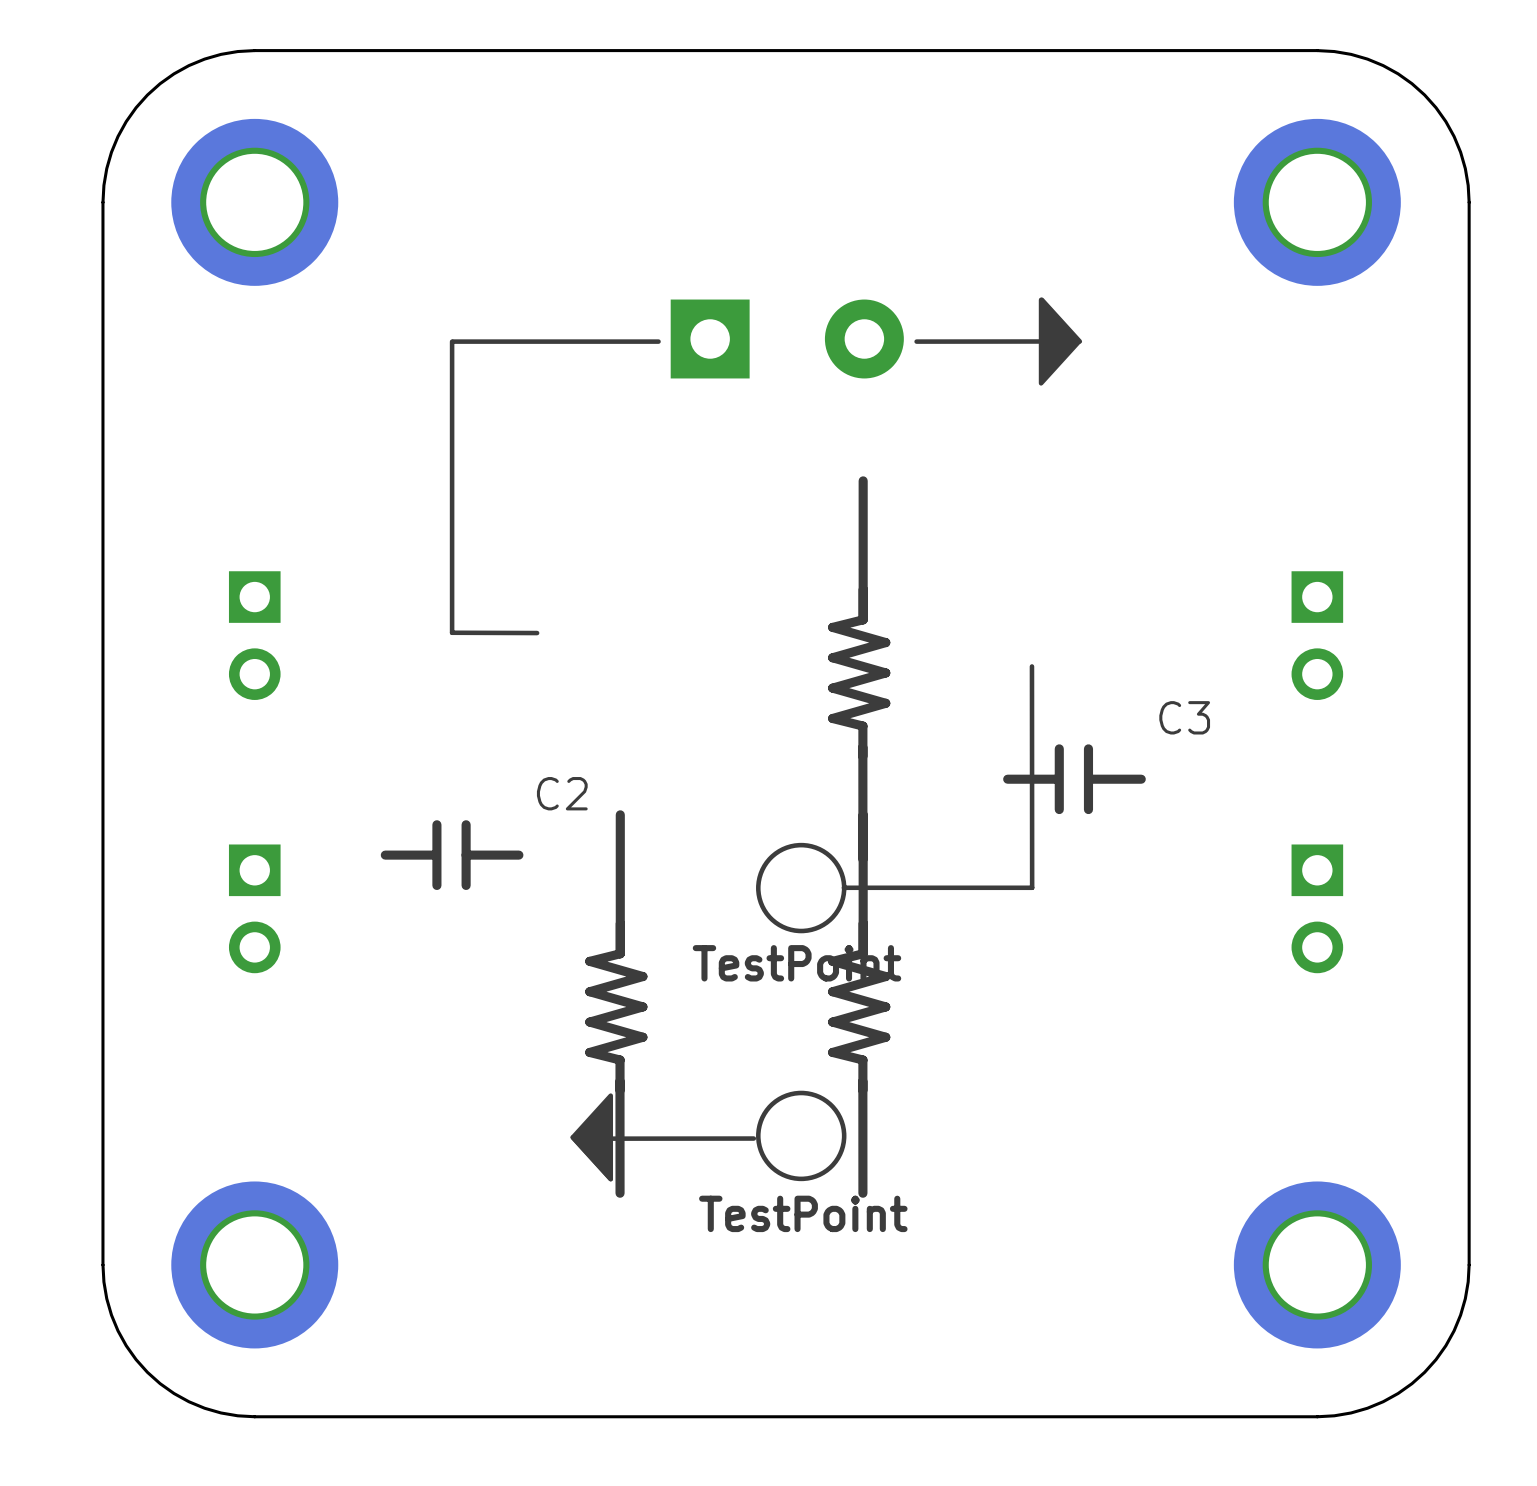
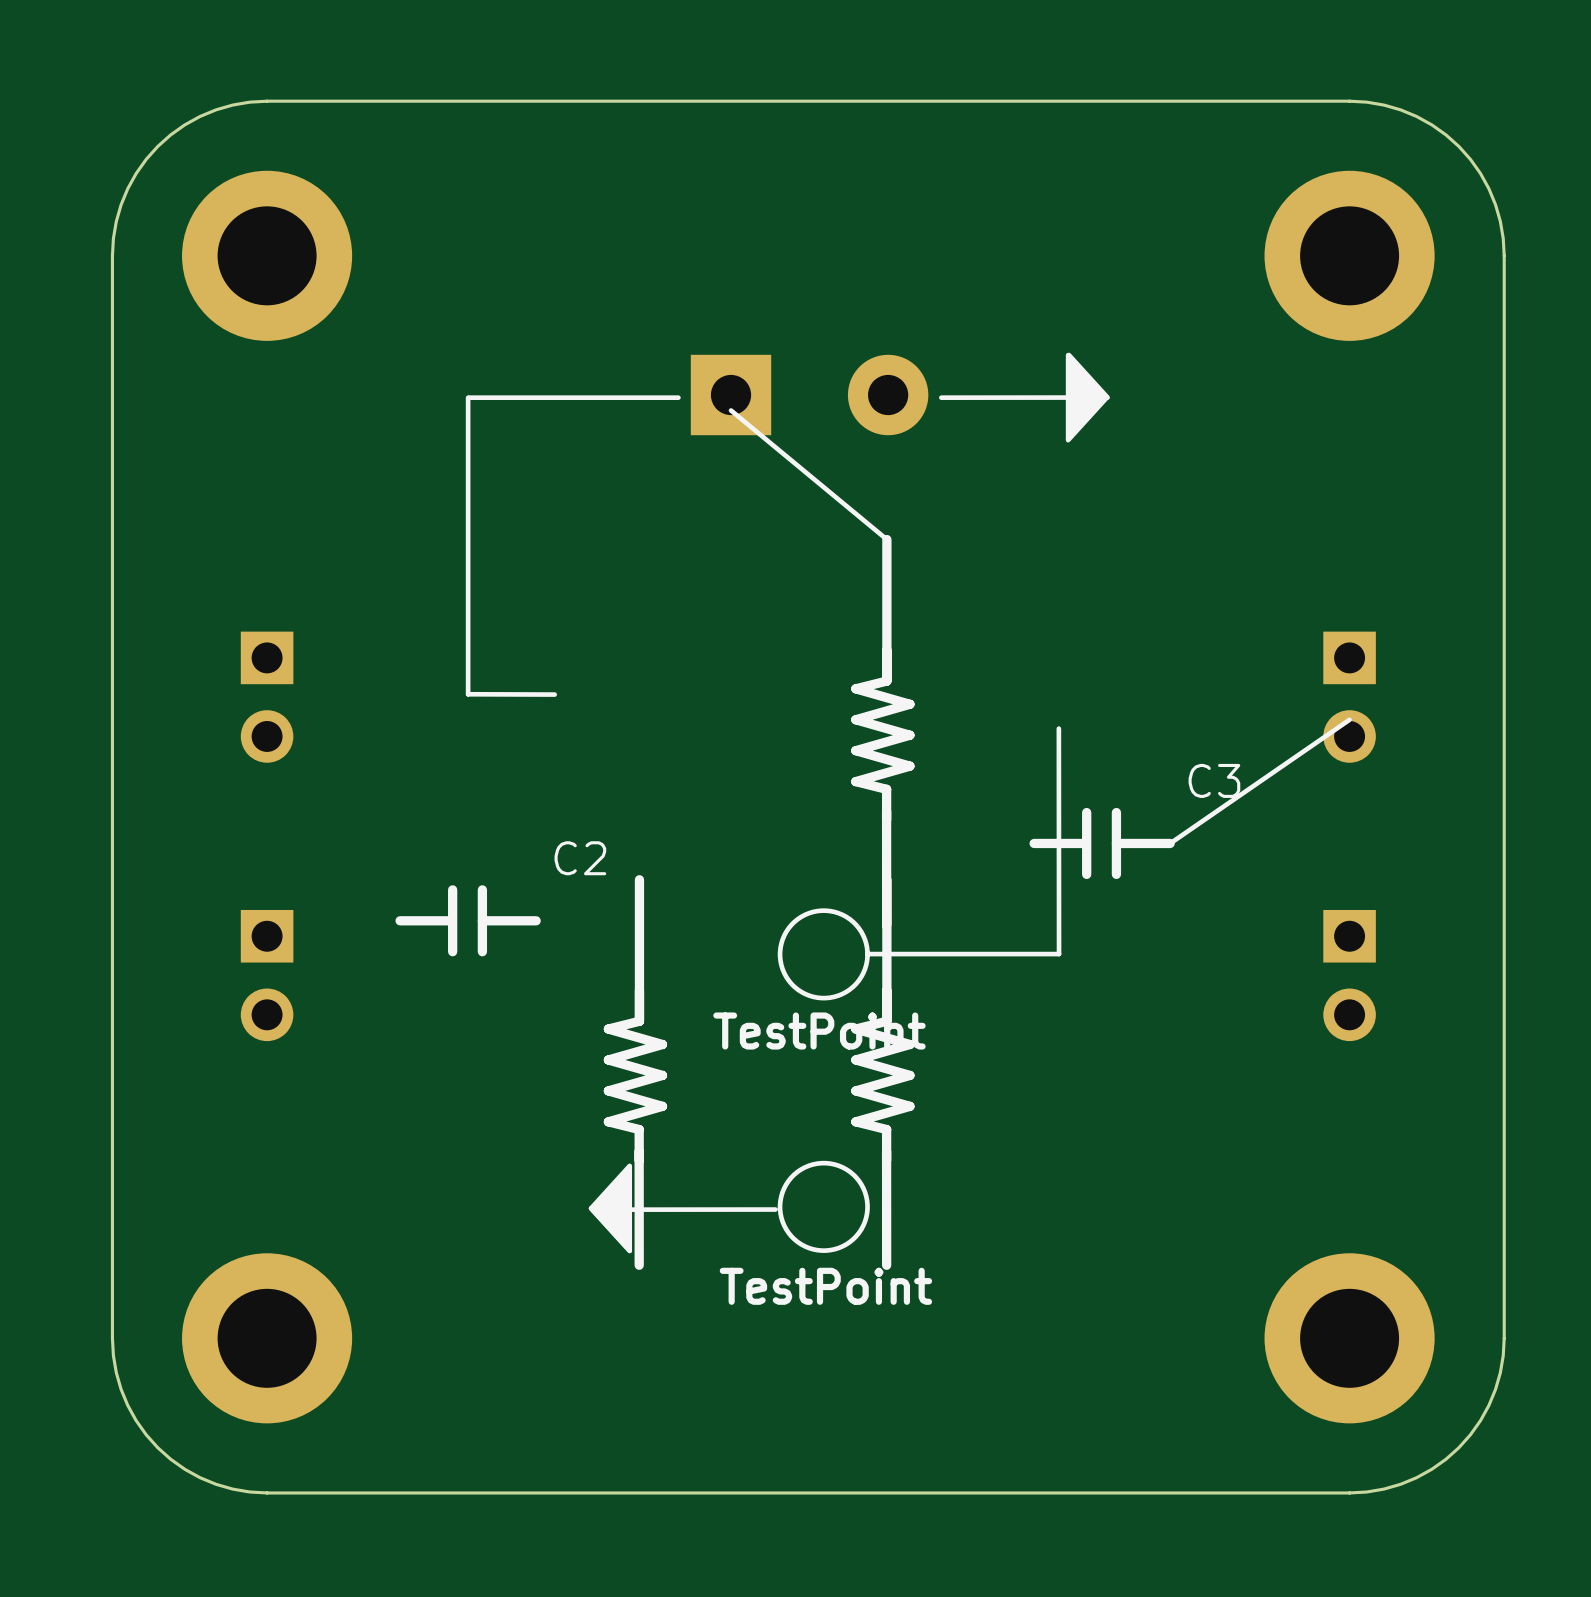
line: none -> (731, 410) (886, 539)
line: none -> (1349, 719) (1170, 843)

